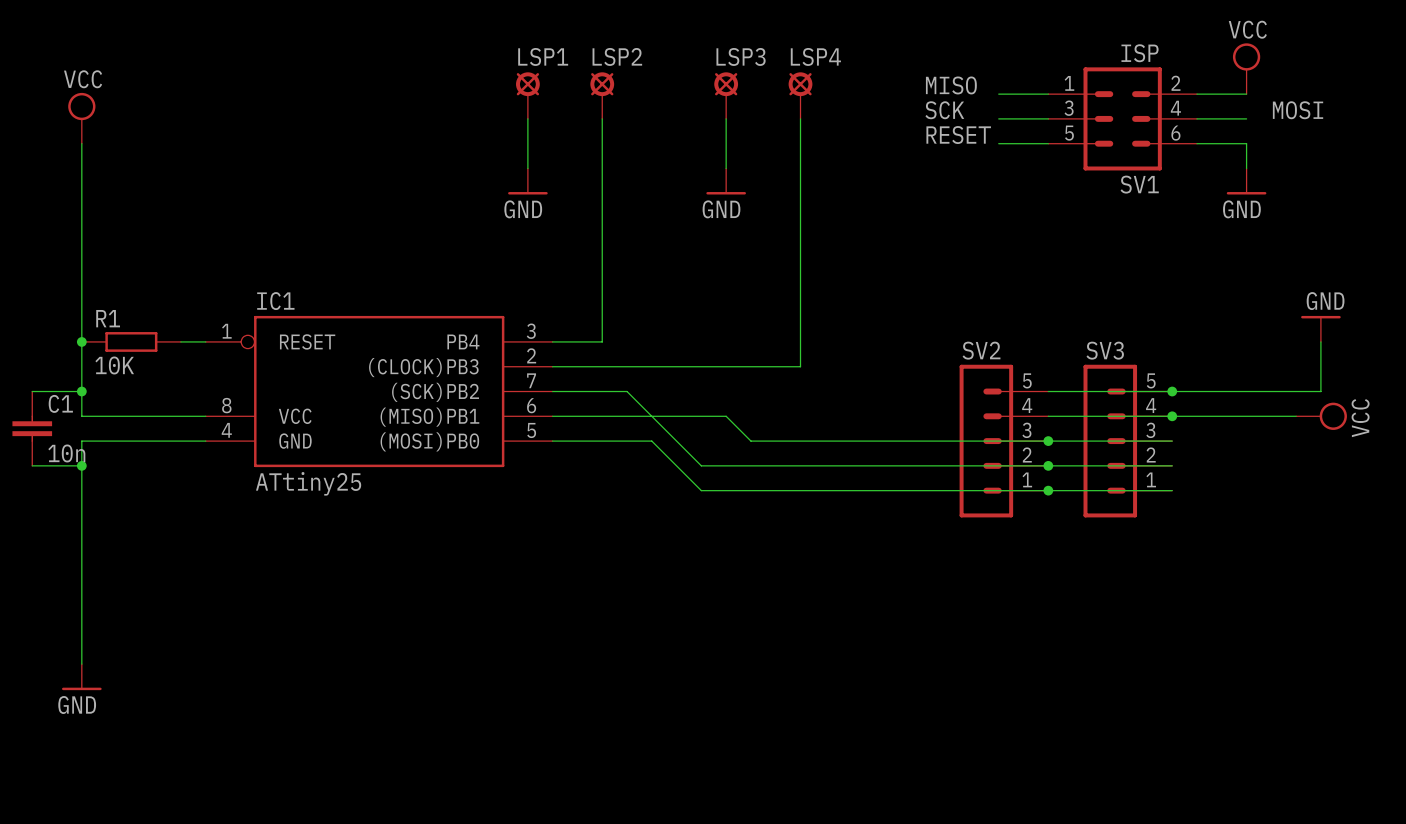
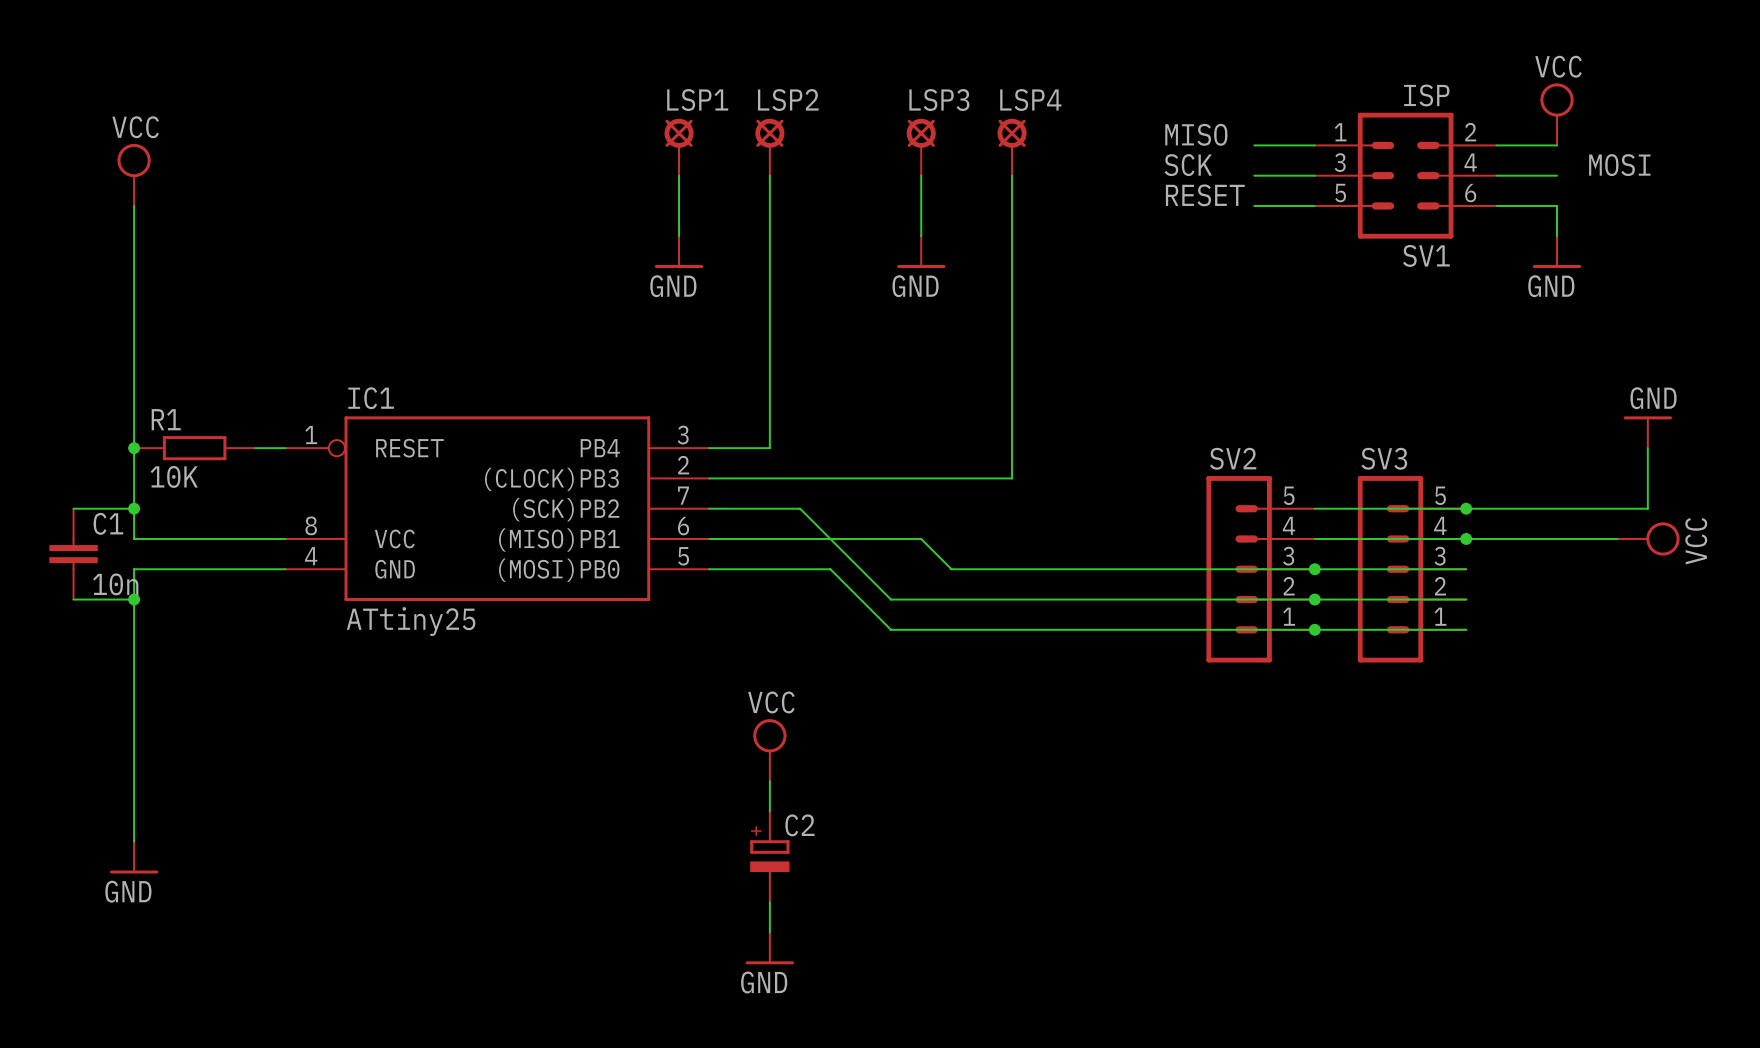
power symbol: none -> VCC (769, 750)
wire: none -> (769, 781) (769, 811)
C2: none -> (769, 856)
wire: none -> (769, 902) (769, 932)
power symbol: none -> GND (769, 948)

